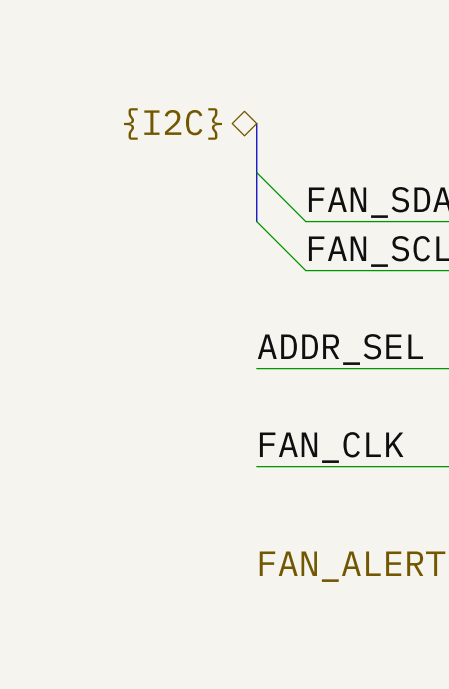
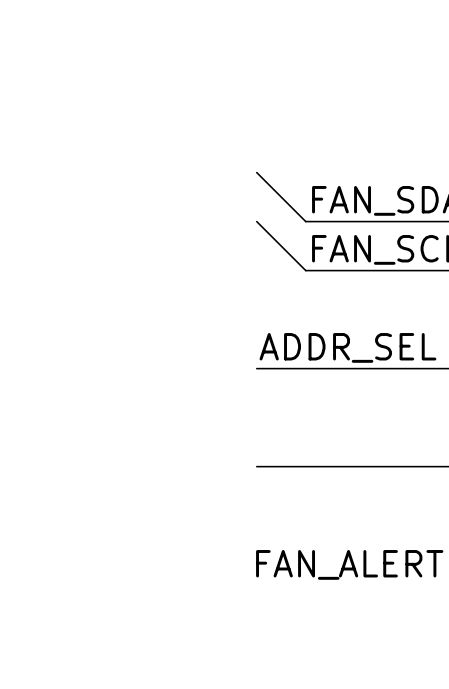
hierarchical label: {I2C} (172, 123) -> none
bus: (256, 123) (256, 221) -> none
label: FAN_CLK (331, 447) -> none

